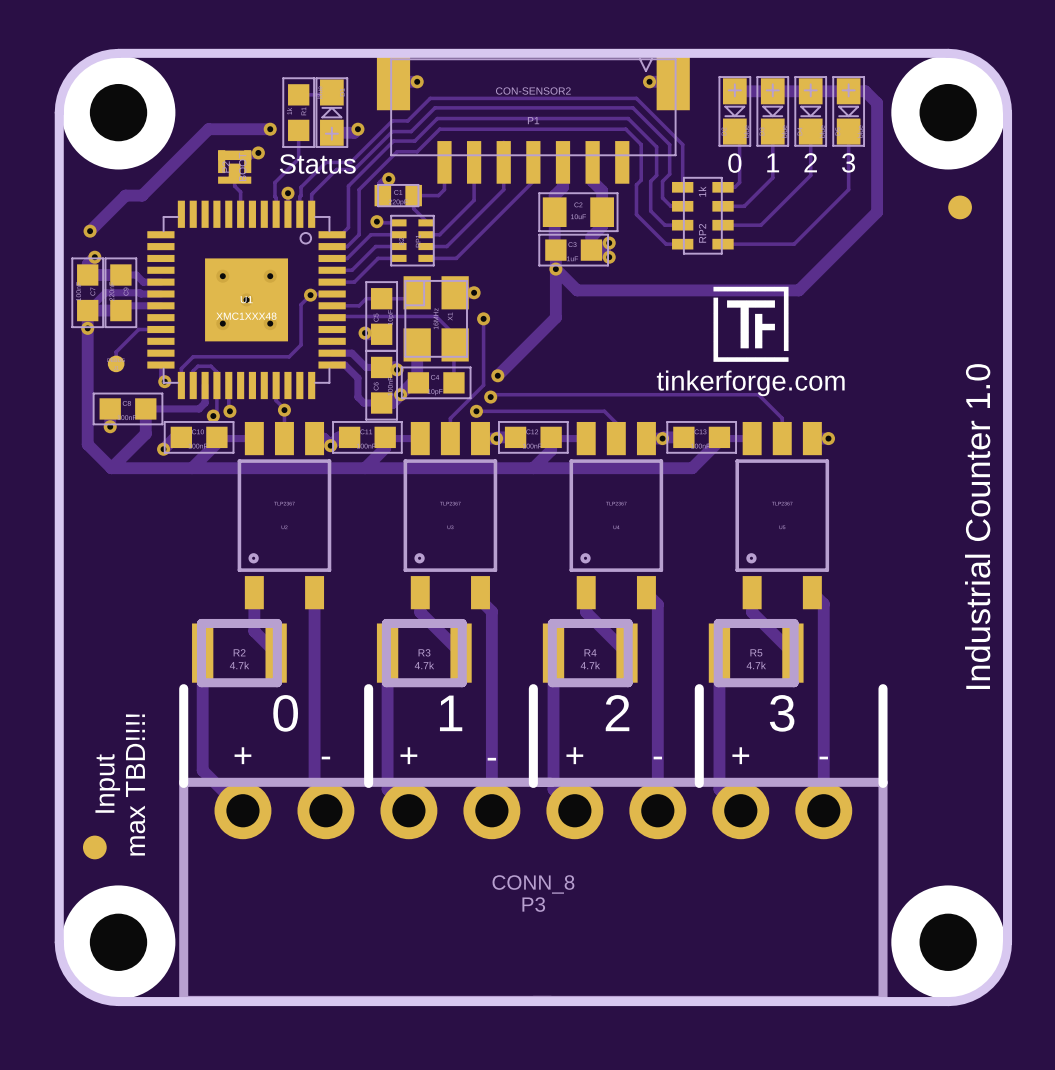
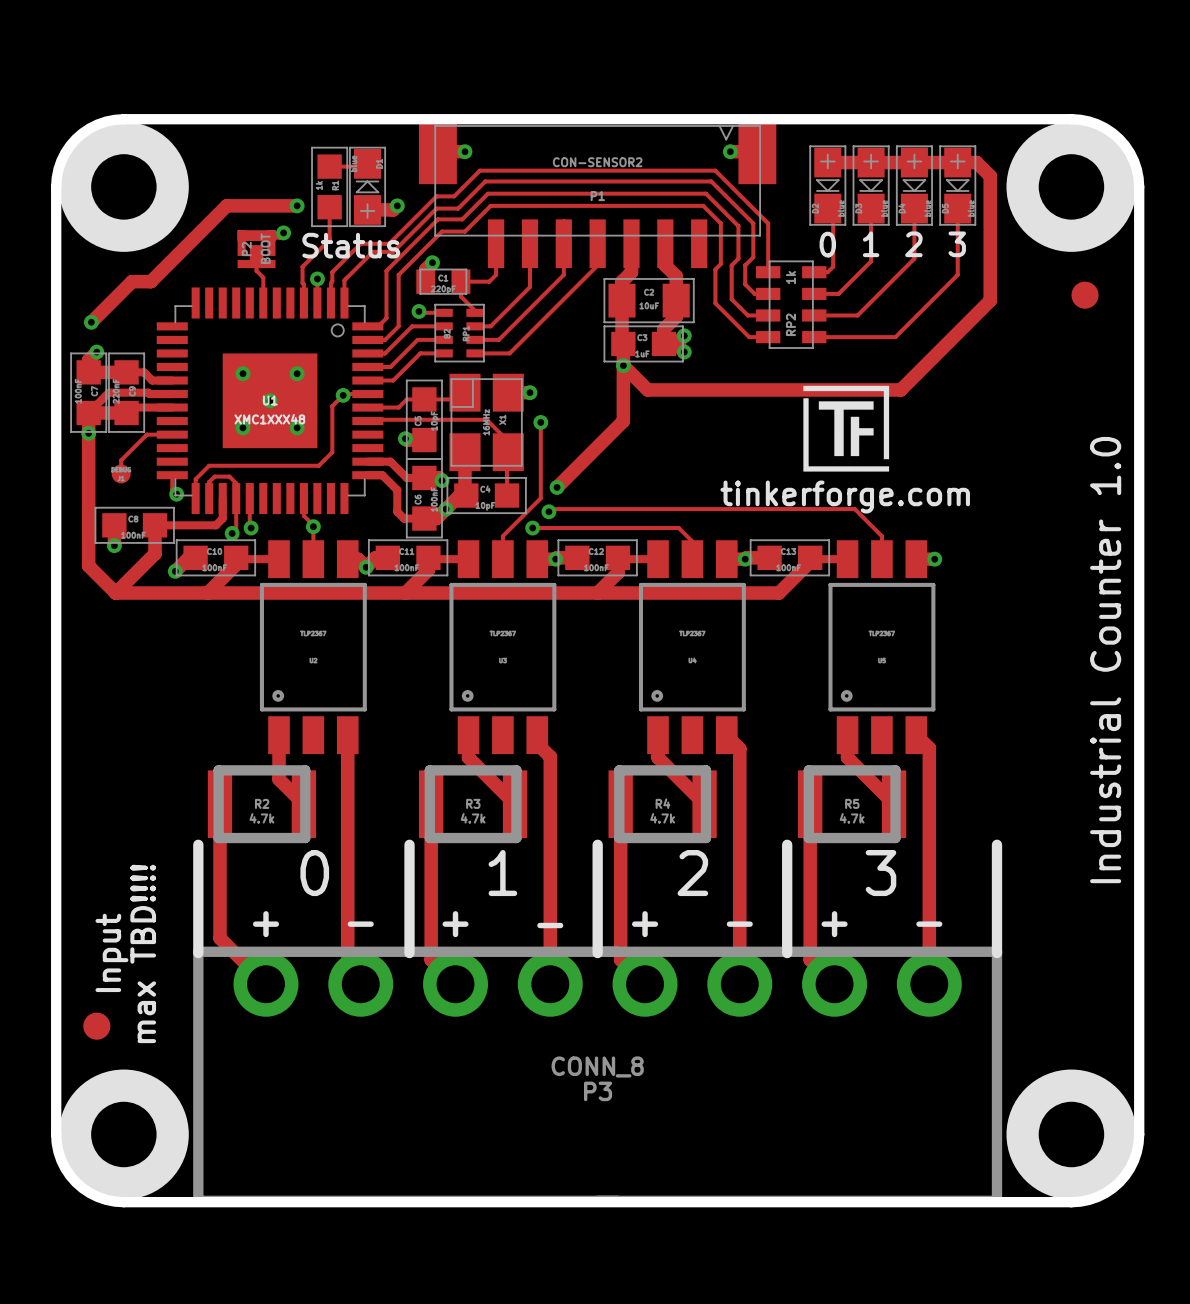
part footprint: [237, 421, 332, 610] -> [259, 540, 367, 755]
part footprint: [403, 421, 498, 610] -> [449, 540, 557, 755]
part footprint: [569, 421, 664, 610] -> [638, 540, 746, 755]
part footprint: [735, 421, 830, 610] -> [828, 540, 936, 755]

